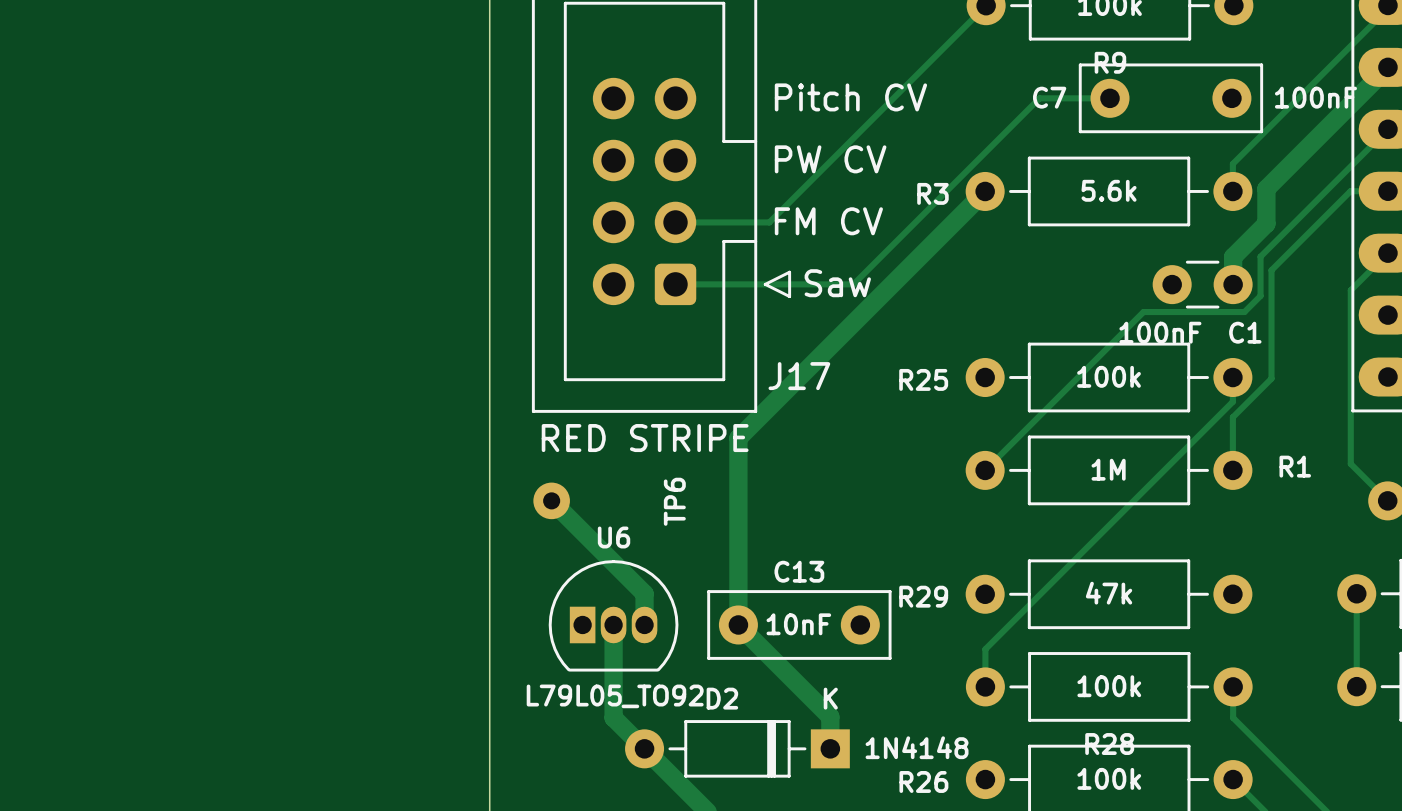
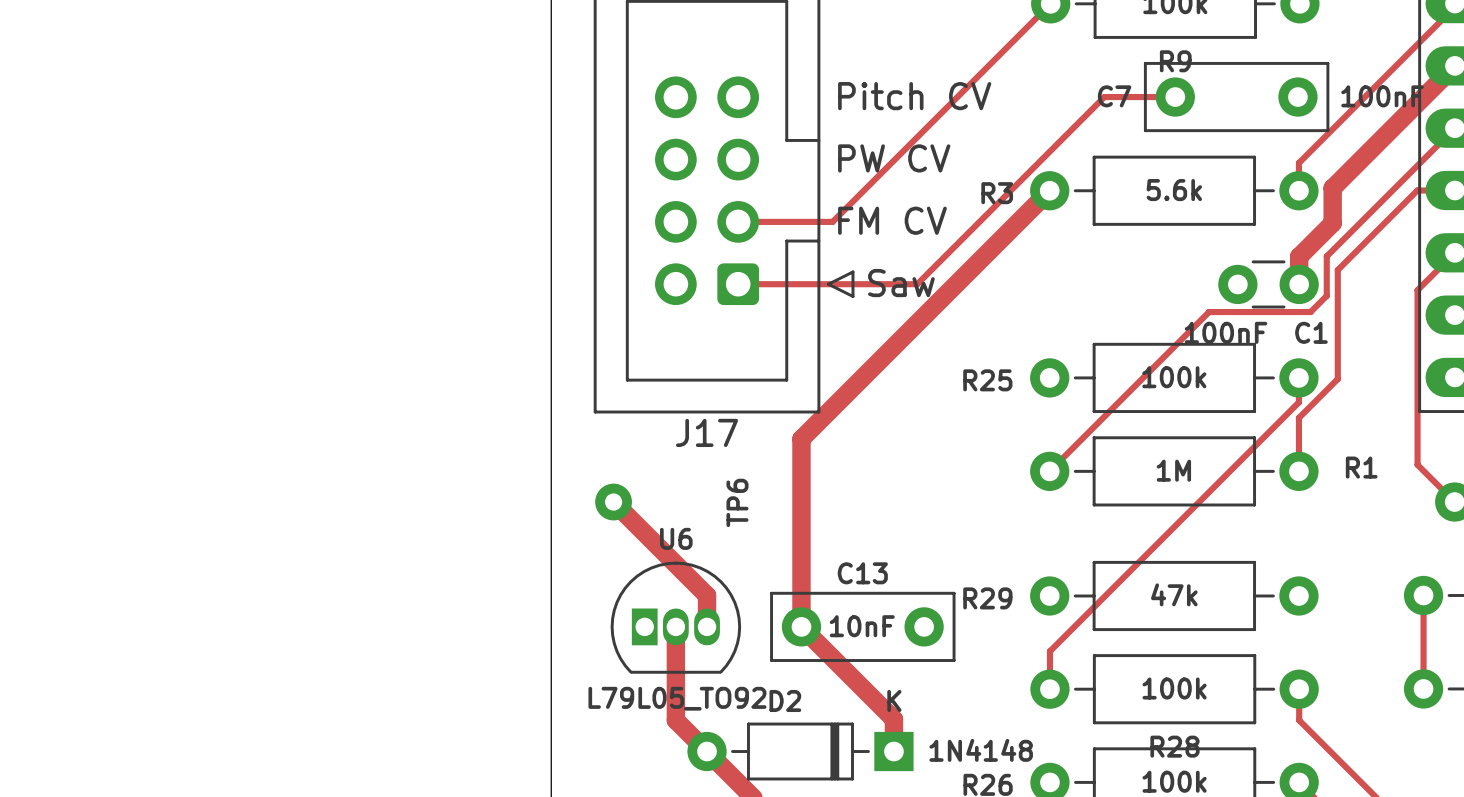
J17 name position: J17 (799, 376) -> J17 (707, 432)
text: RED STRIPE (645, 438) -> none

